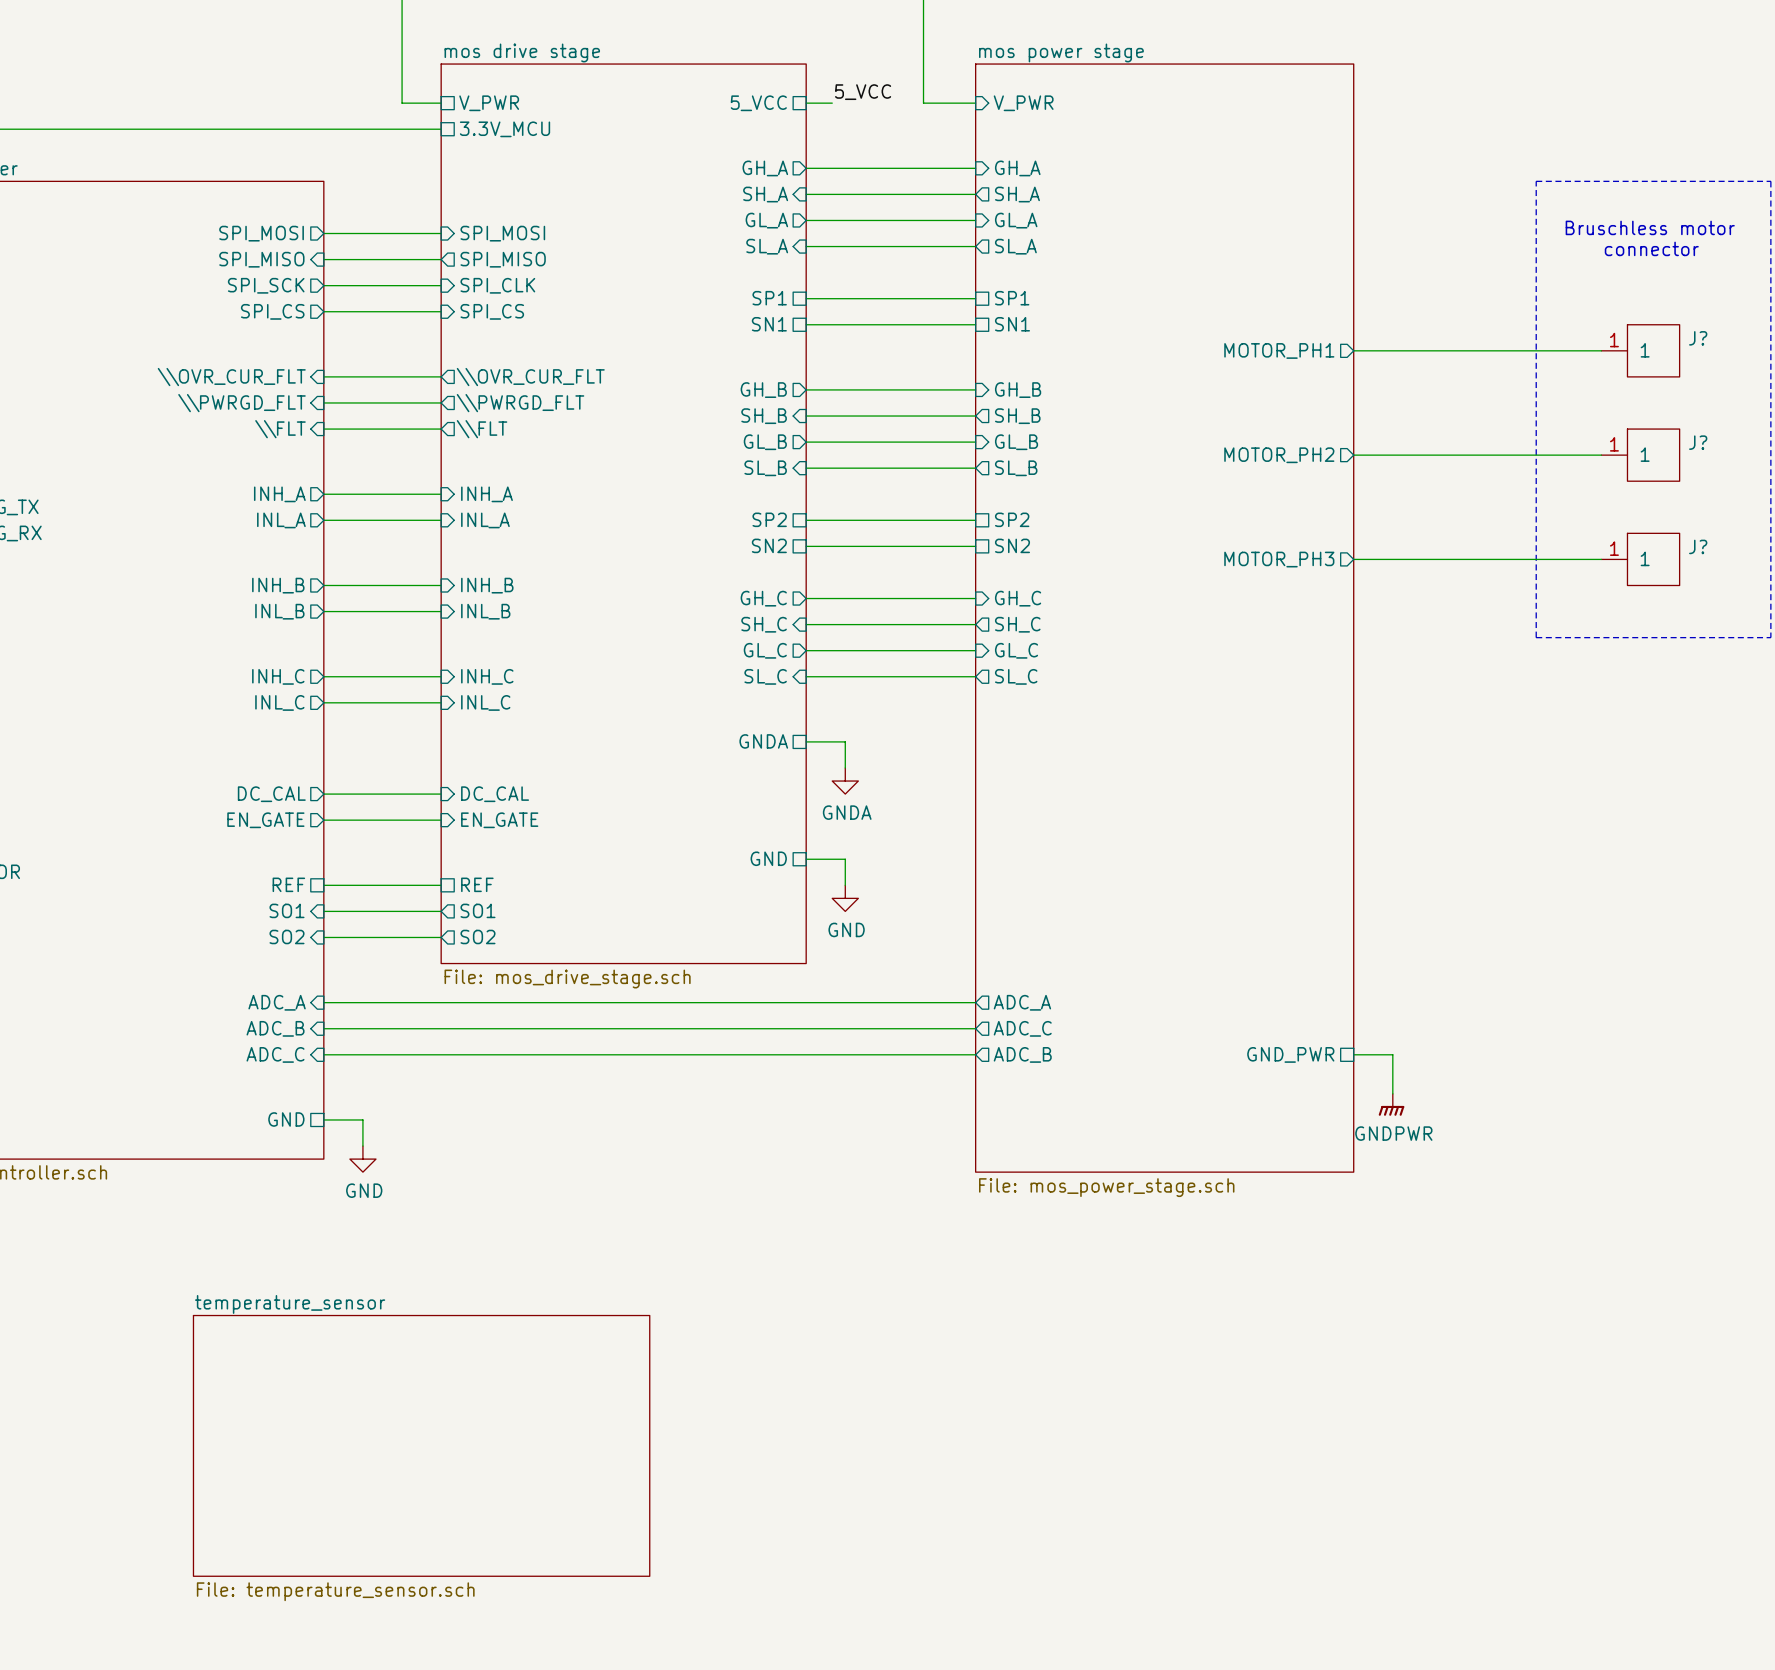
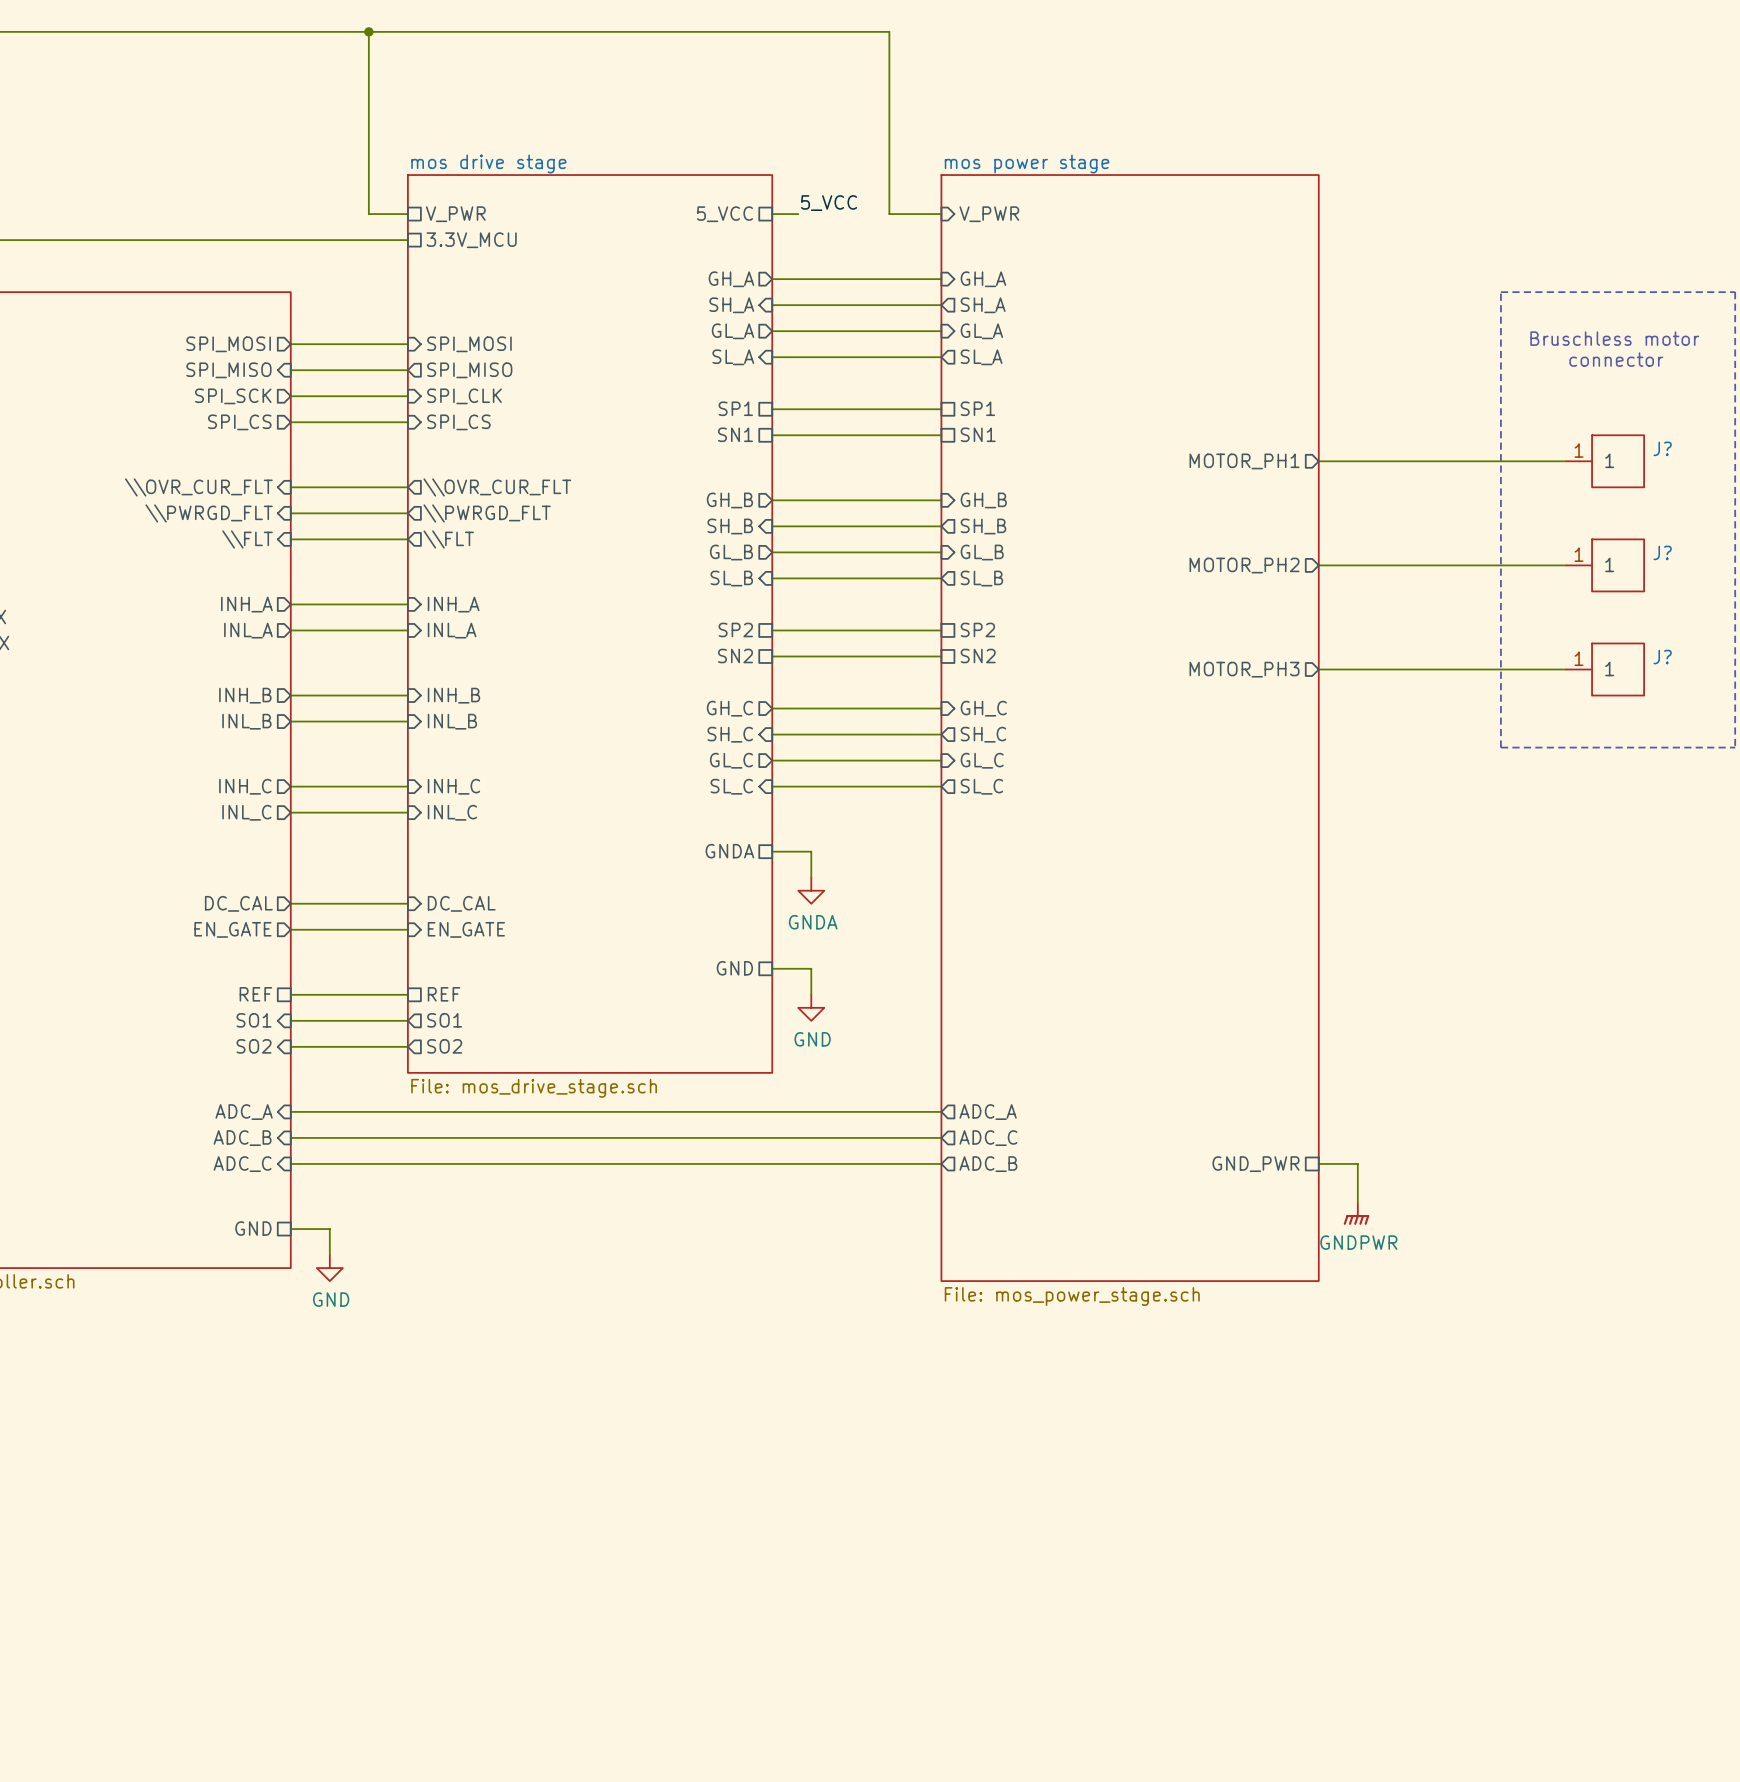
sheet temperature_sensor: File: temperature_sensor.sch (421, 1445) -> none

